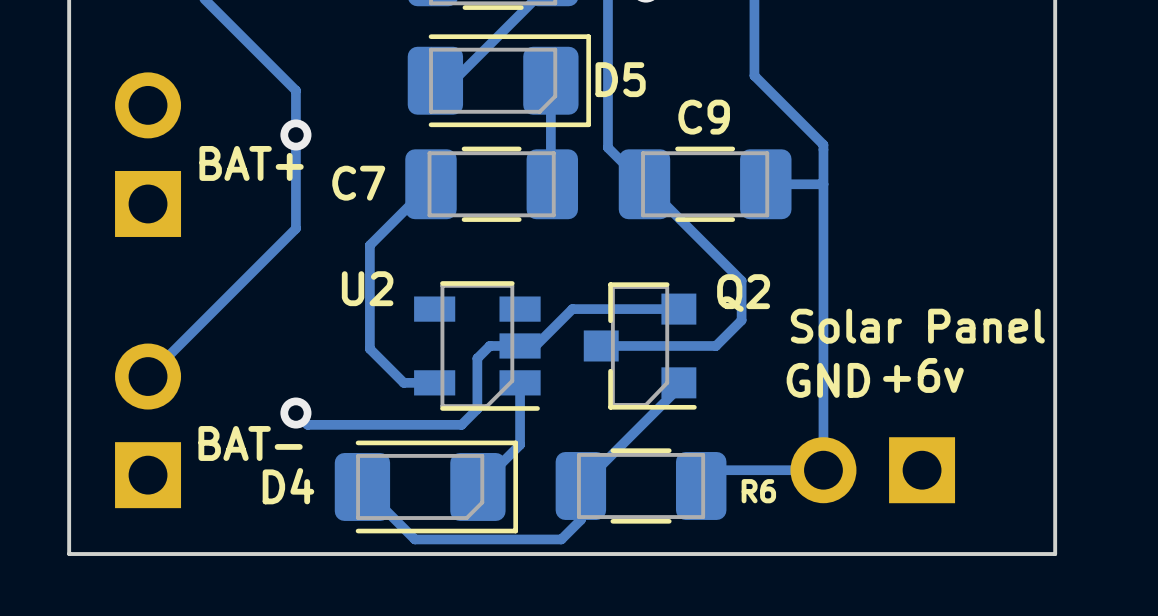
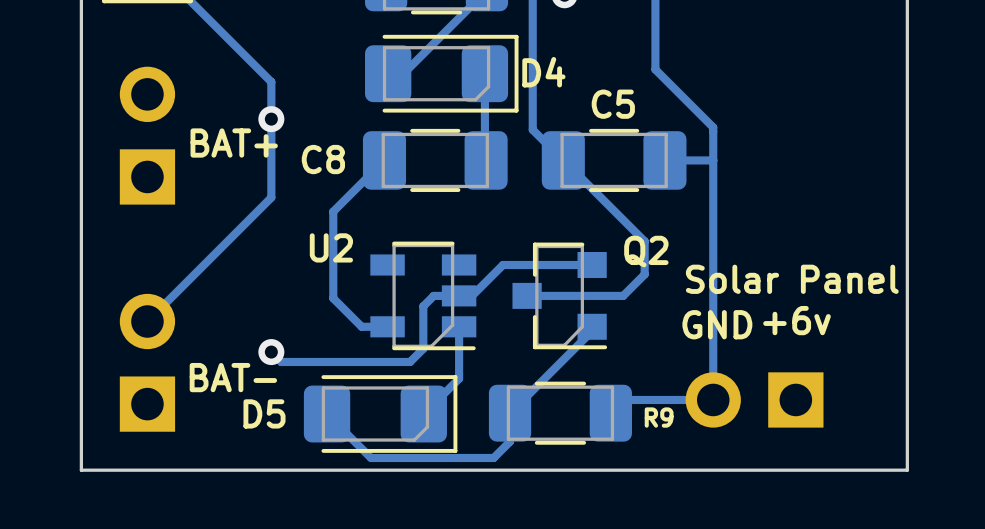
D5 name: D5 (620, 79) -> D4 (543, 72)
C9 name: C9 (704, 117) -> C5 (613, 104)
C7 name: C7 (358, 183) -> C8 (323, 159)
D4 name: D4 (288, 486) -> D5 (264, 413)
R6 name: R6 (758, 491) -> R9 (659, 417)

